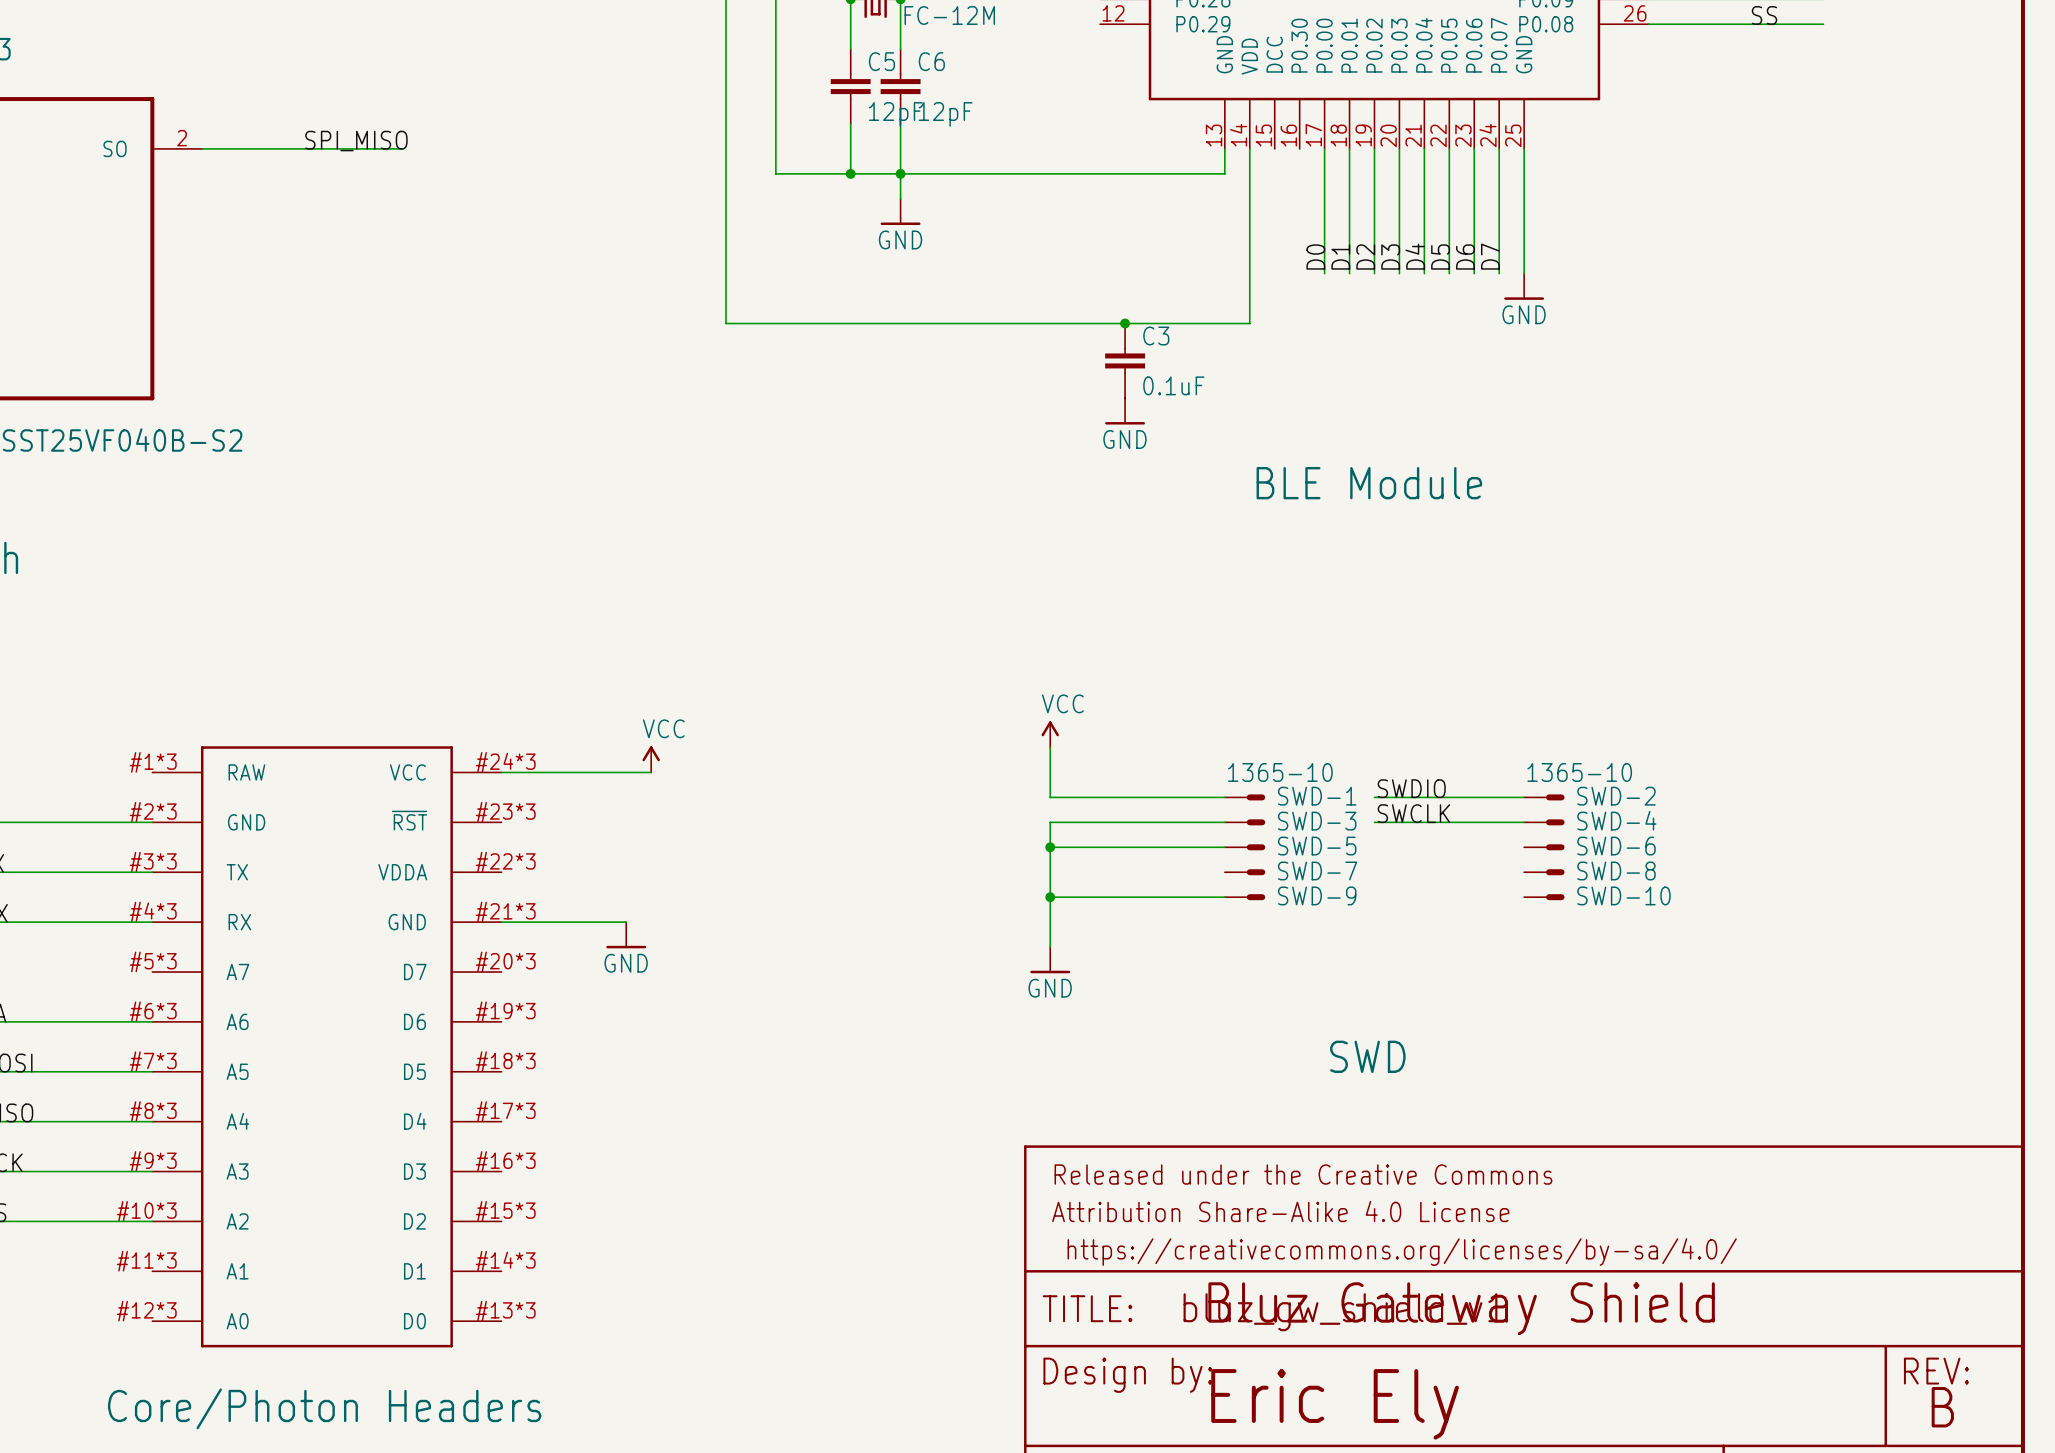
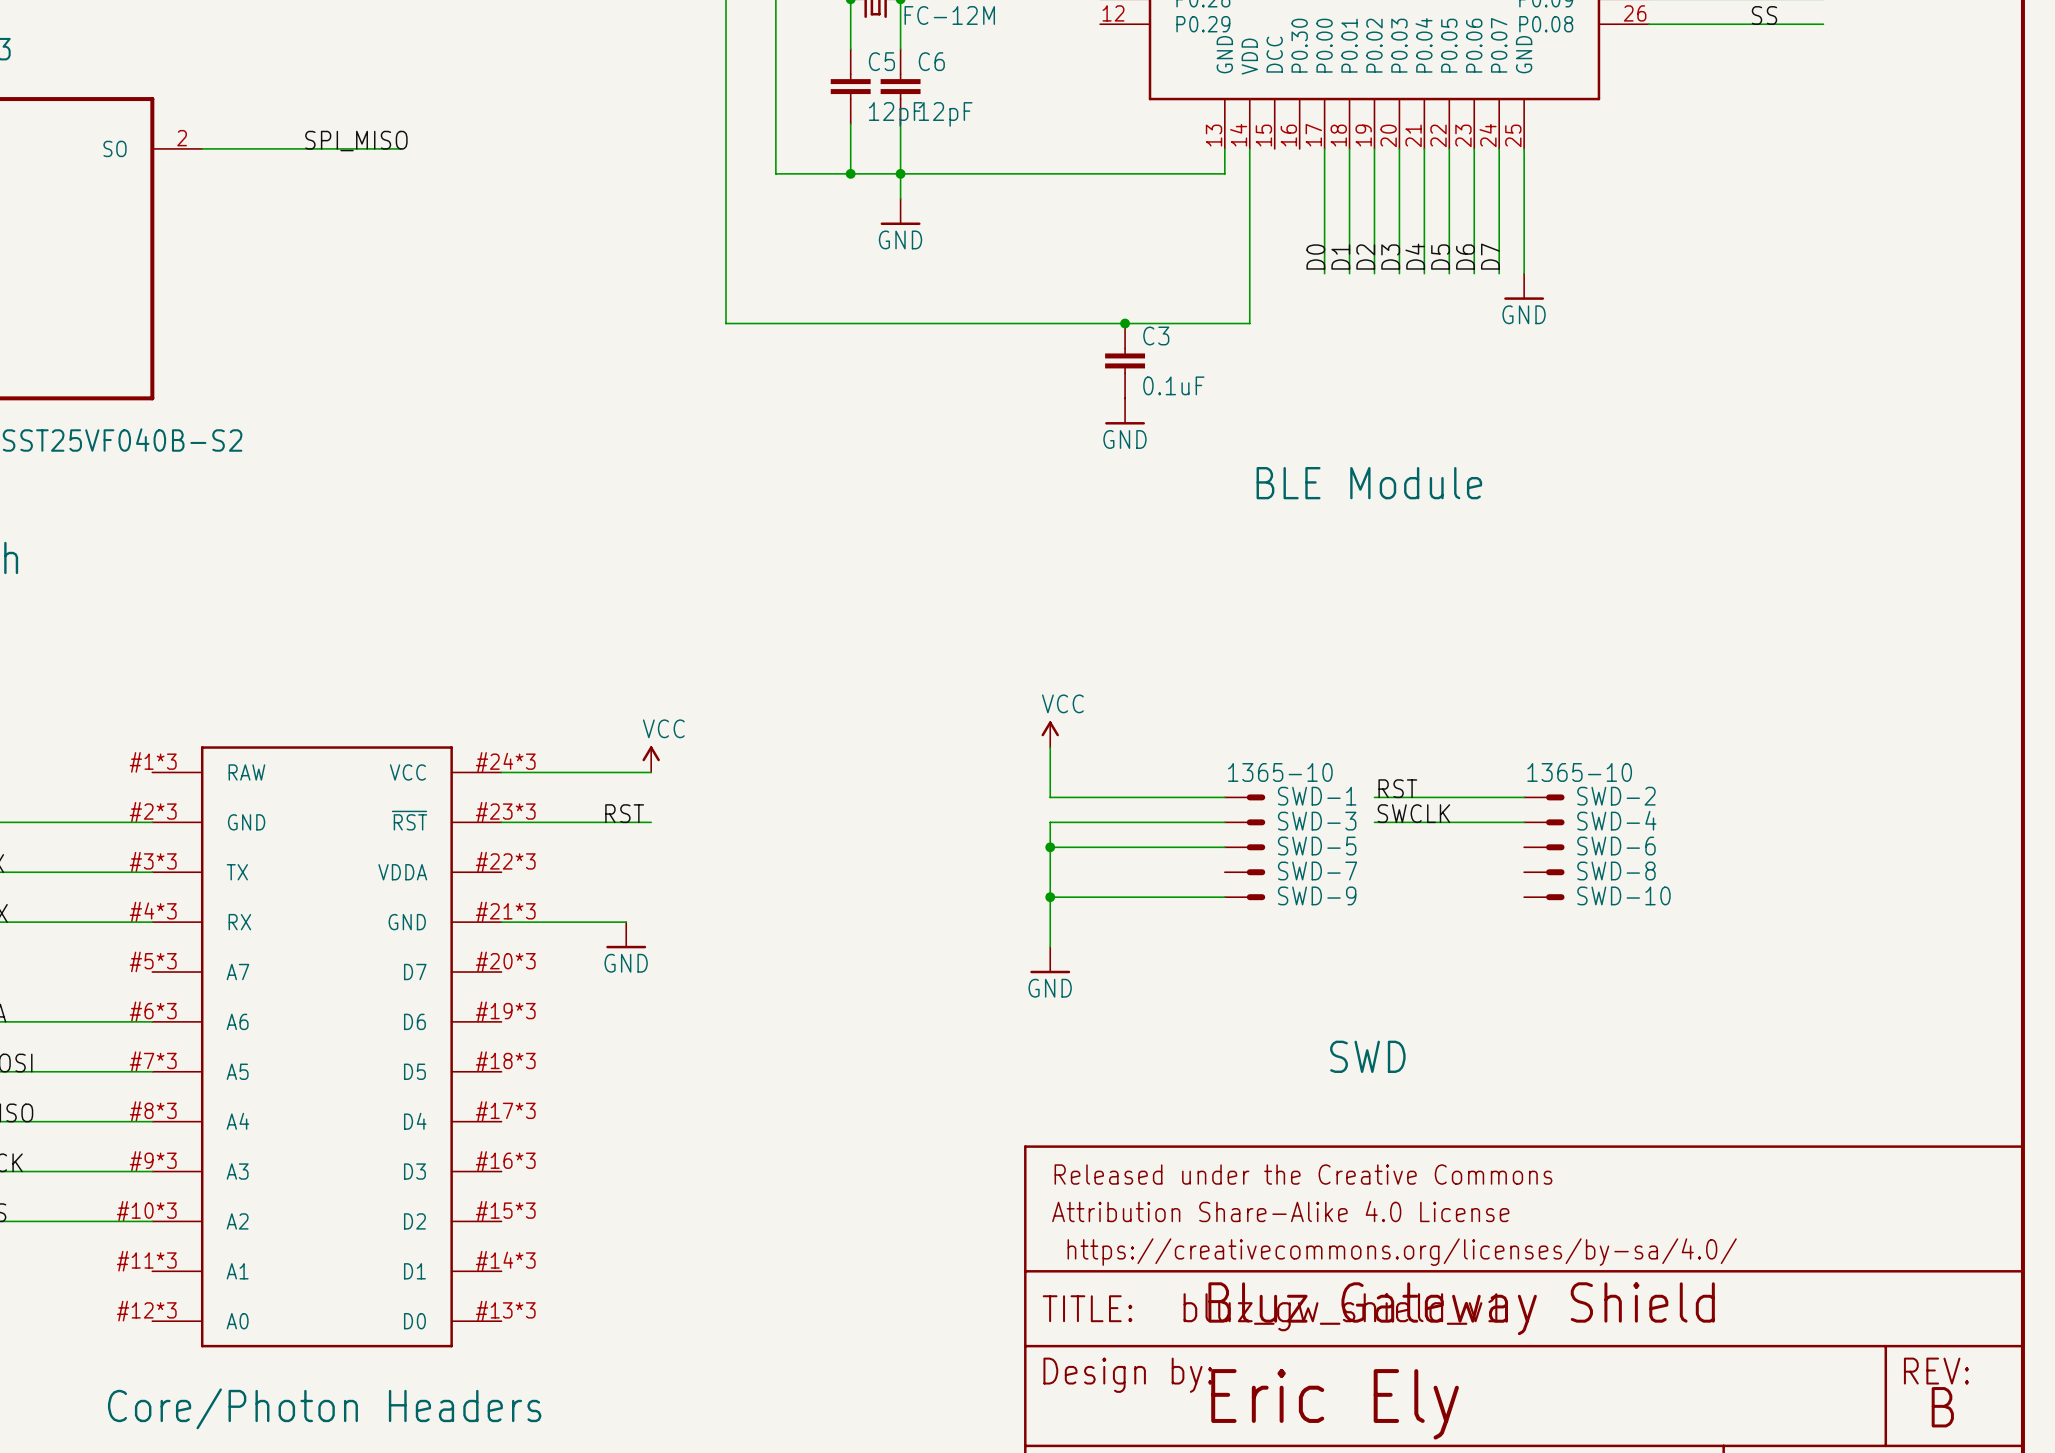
label: SWDIO (1411, 788) -> RST (1397, 788)
label: none -> RST (624, 813)
wire: none -> (501, 822) (651, 822)

